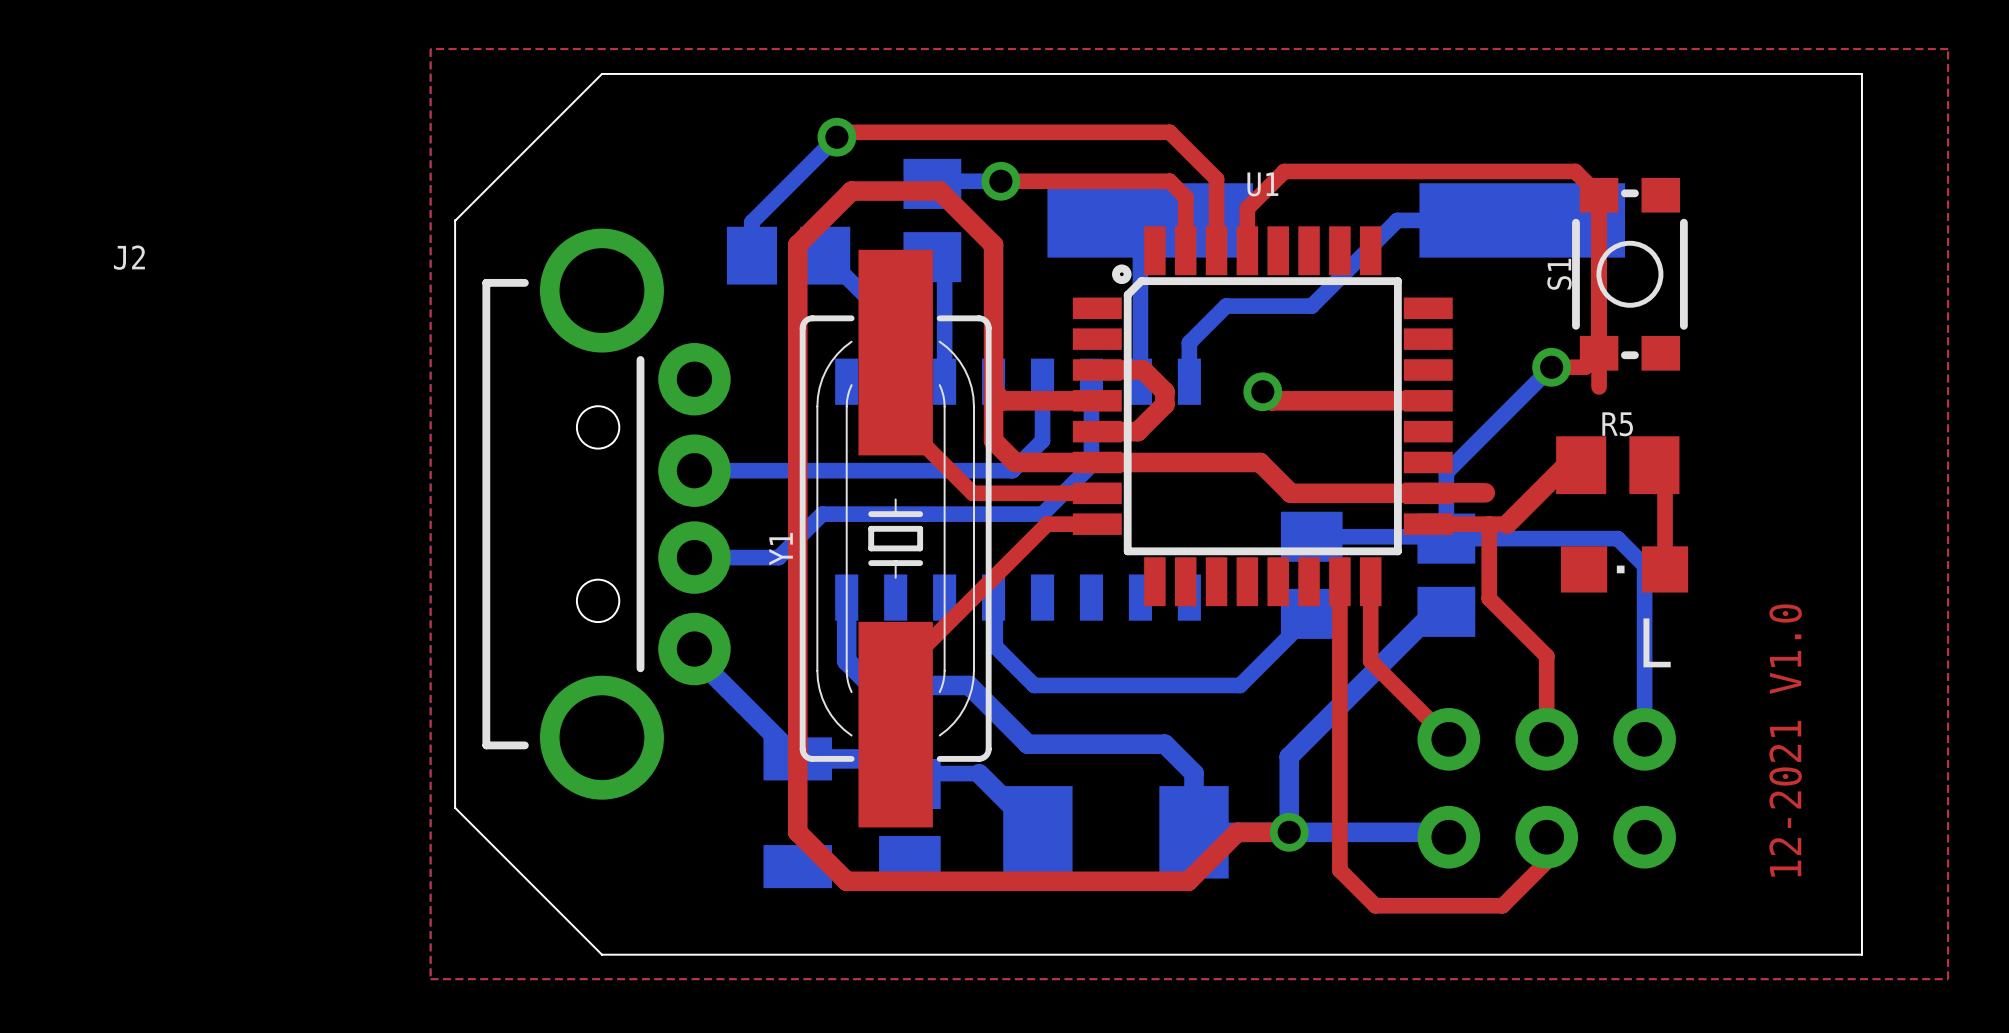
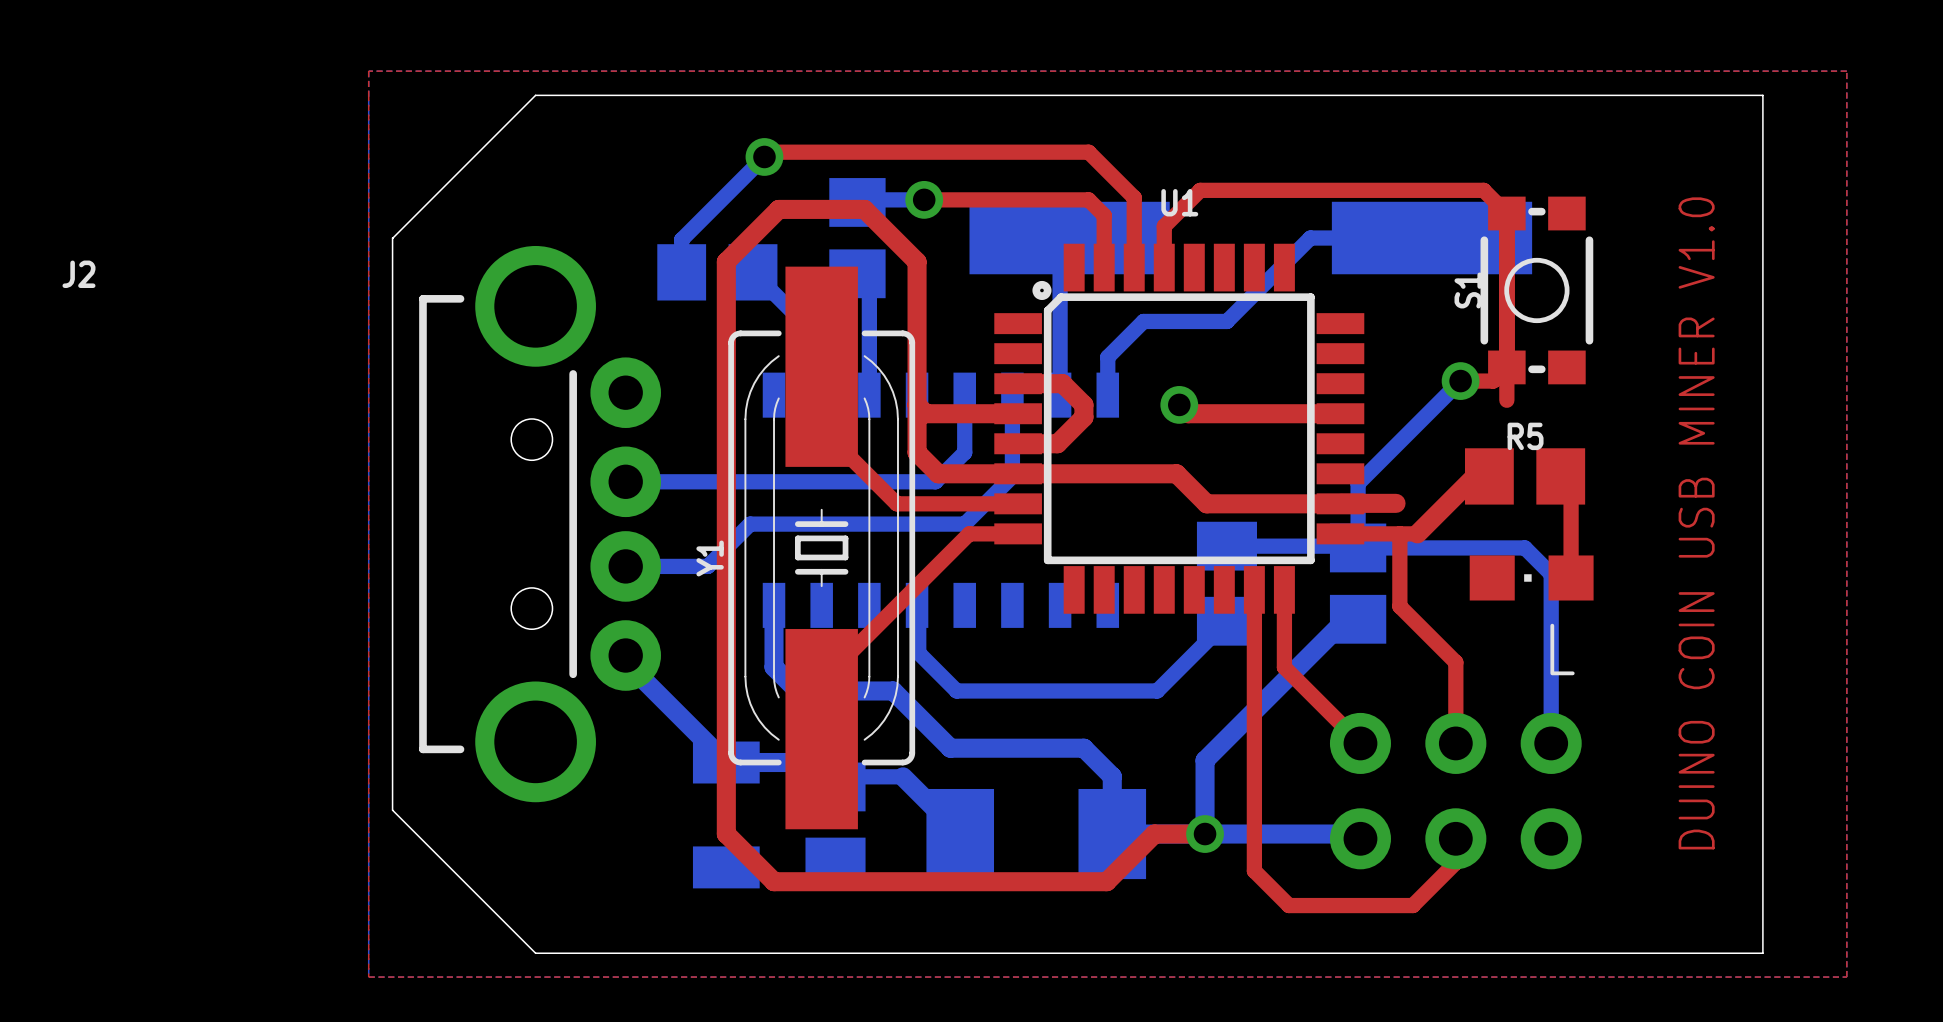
text: none -> DUINO COIN USB MINER V1.0 (1696, 523)
text: 12-2021 V1.0 (1785, 740) -> none

